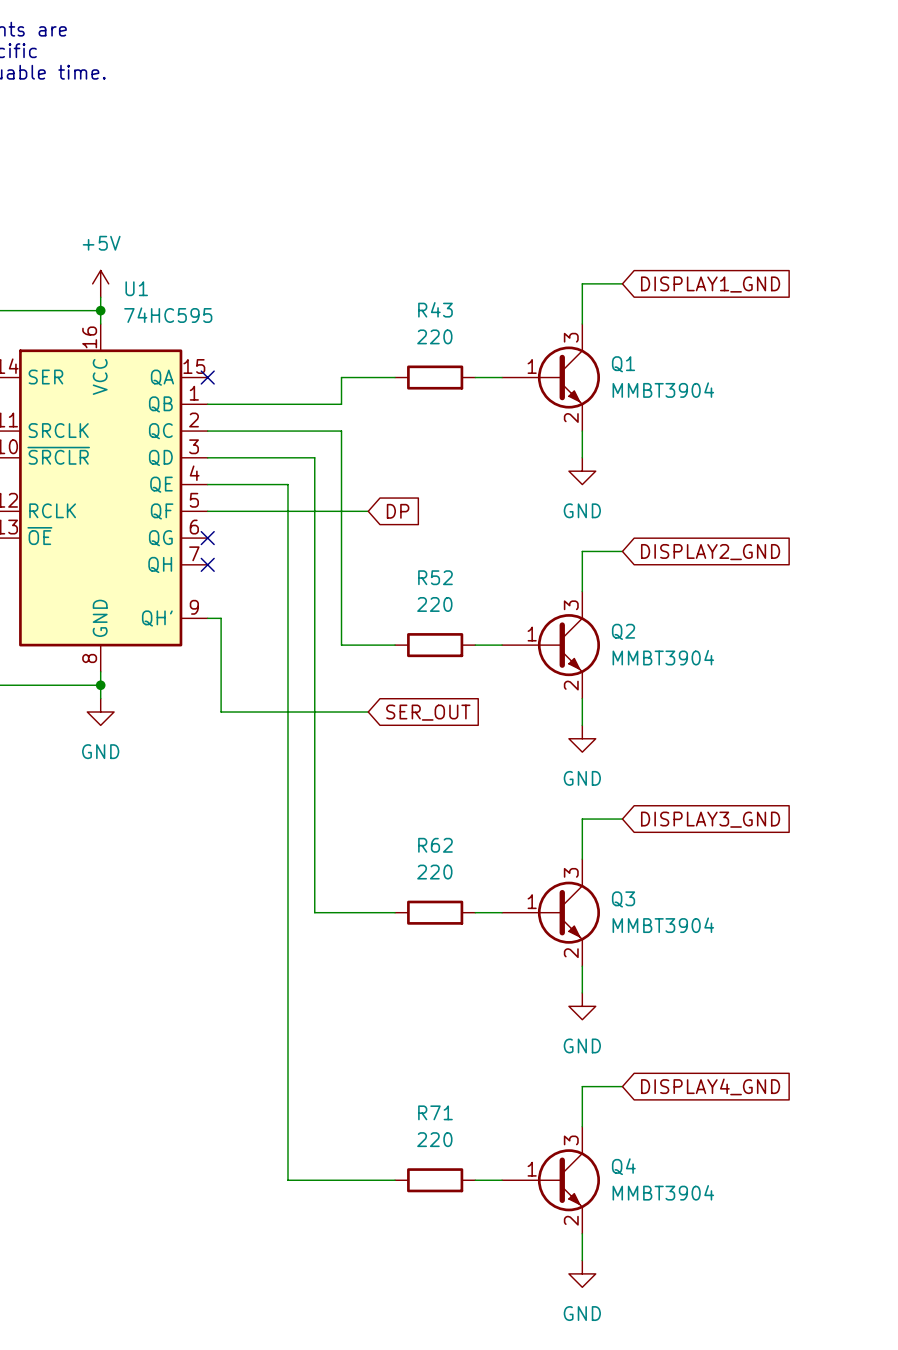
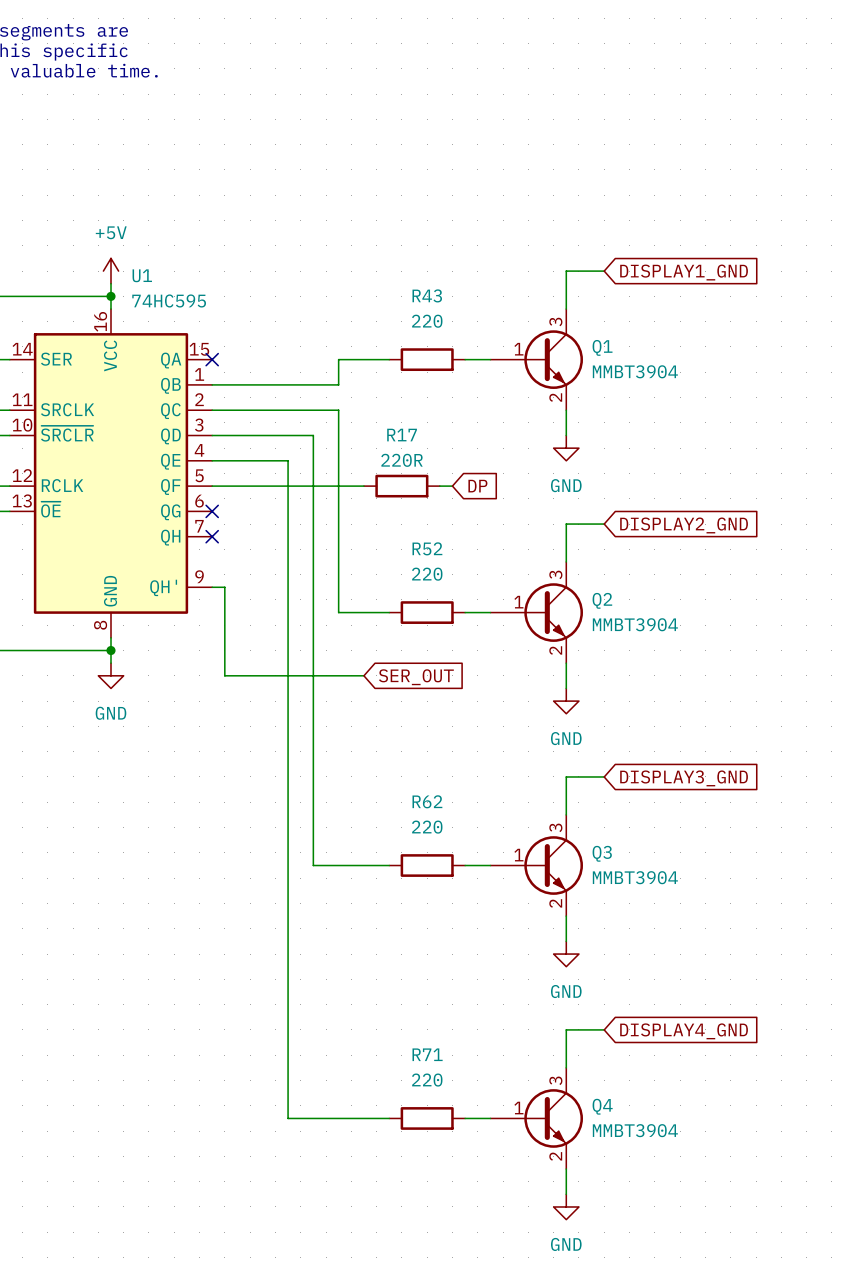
global label position: DP (398, 511) -> DP (477, 486)
R17: none -> 220R (401, 486)
wire: none -> (439, 486) (452, 486)

